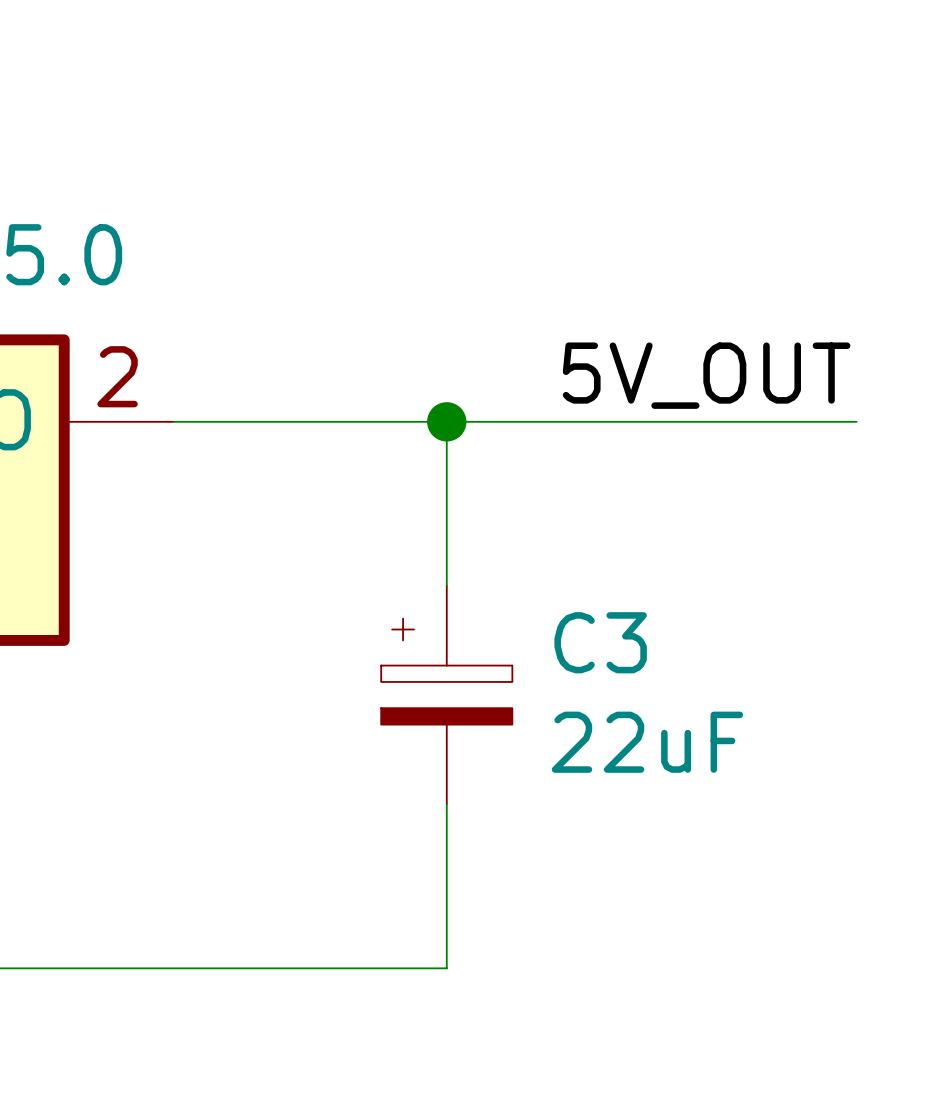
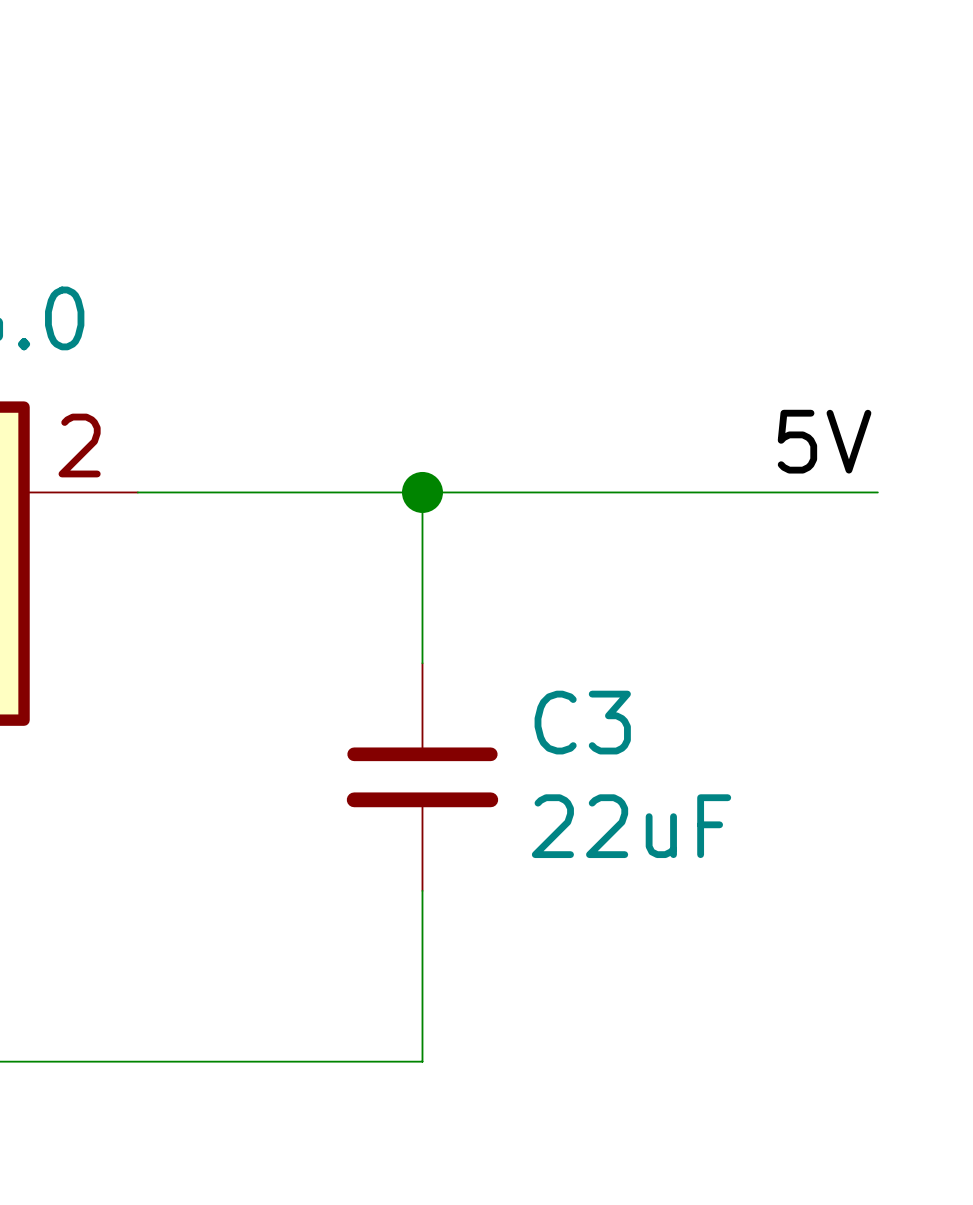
label: 5V_OUT (706, 375) -> 5V (824, 441)
wire: none -> (849, 492) (877, 492)
C3 symbol: [381, 585, 513, 805] -> [346, 663, 499, 891]

